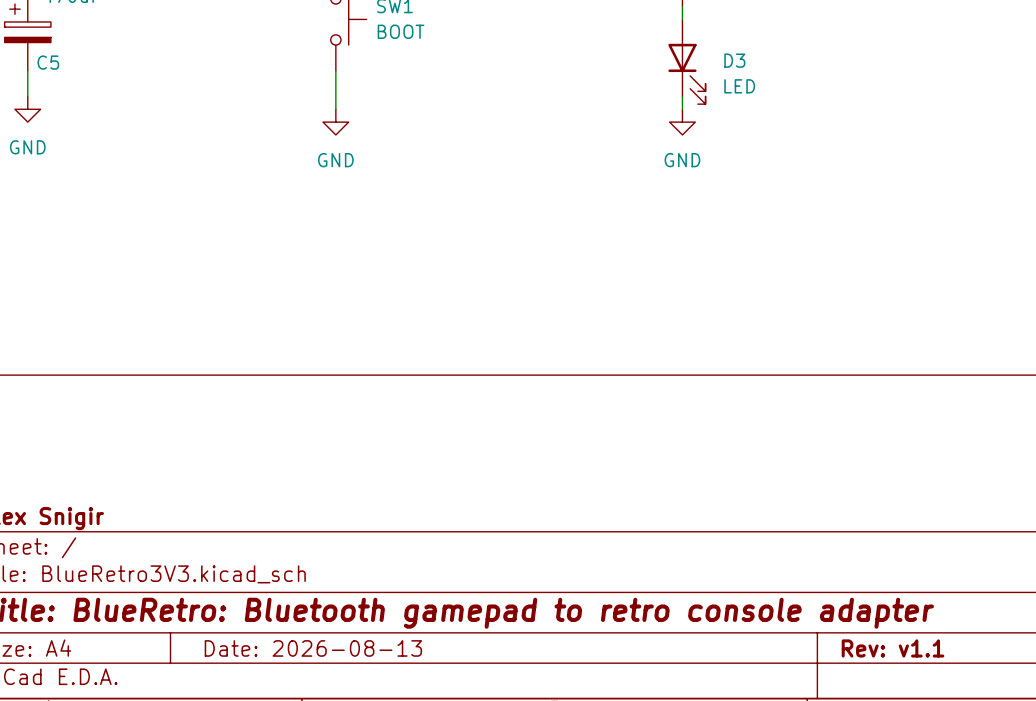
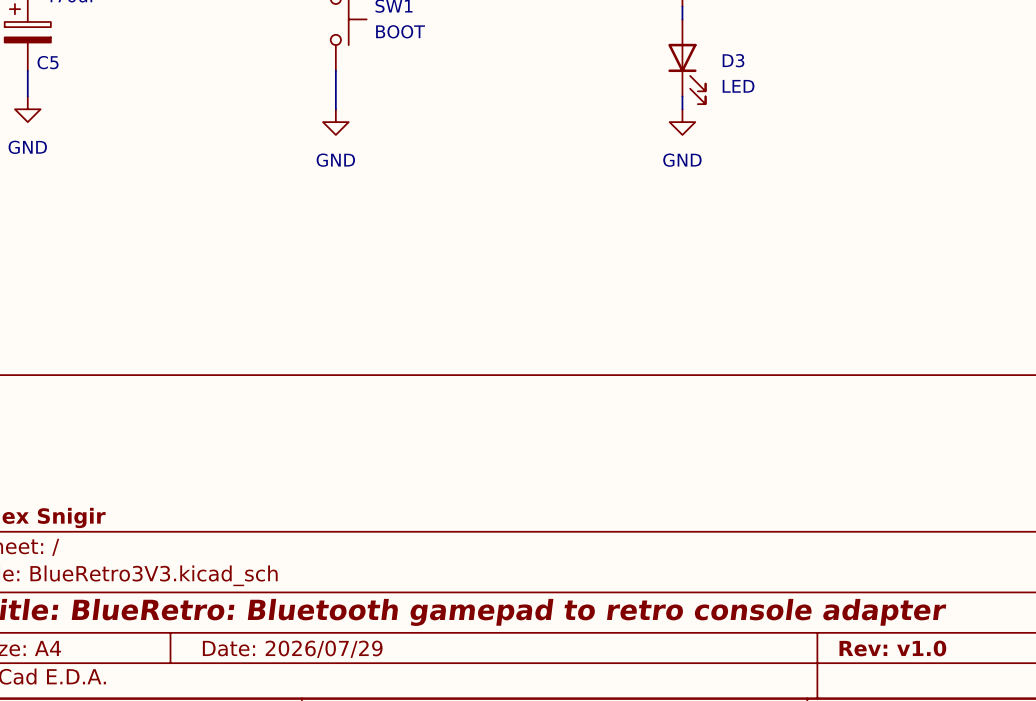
title block: Date: 2026-08-13 (313, 648) -> Date: 2026/07/29 (292, 649)
title block: Rev: v1.1 (893, 648) -> Rev: v1.0 (892, 648)

